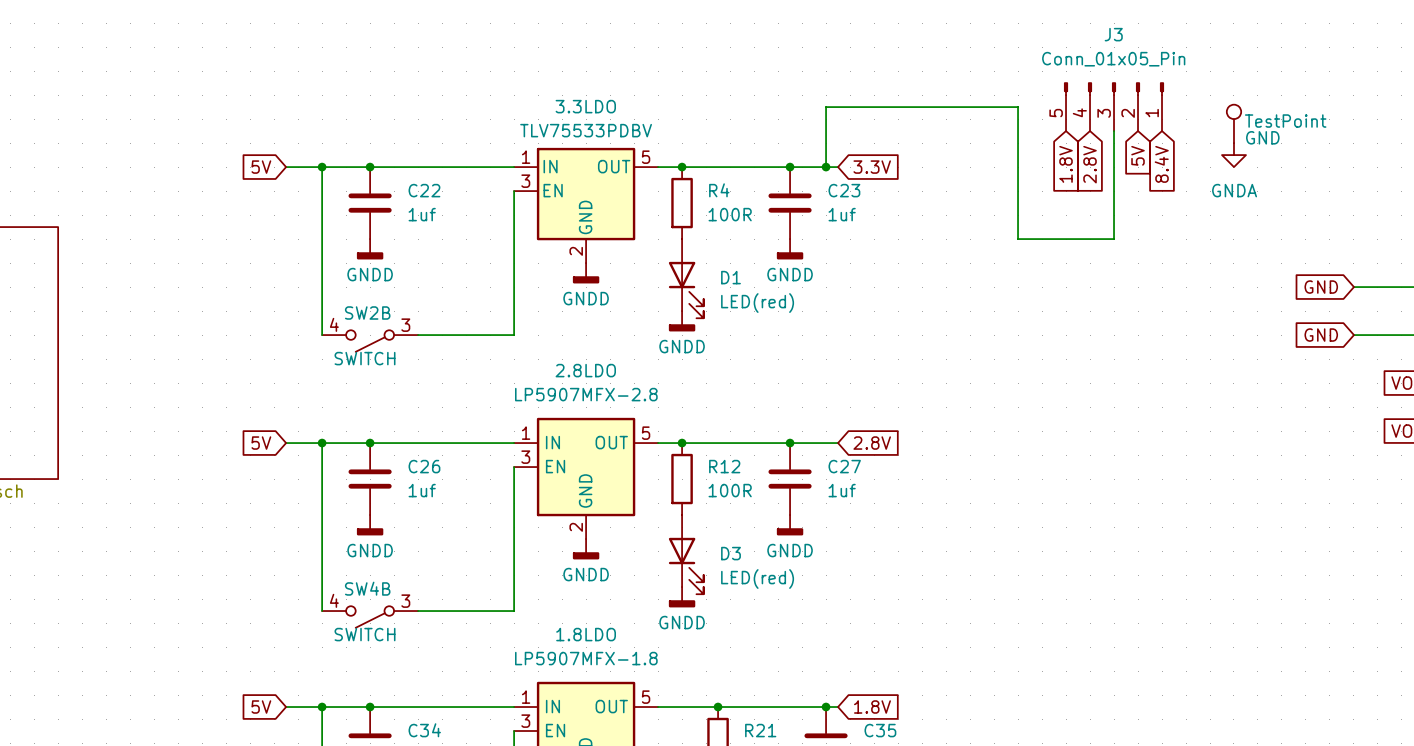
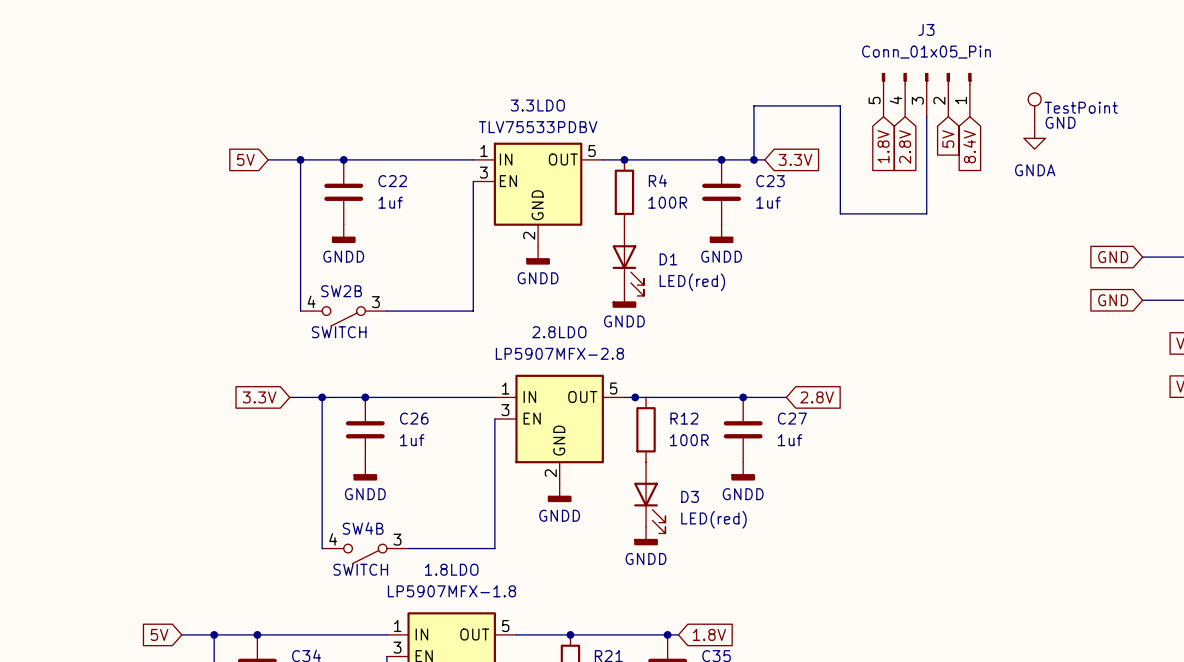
wire: (1018, 119) (1018, 107) (826, 107) (826, 167) -> (840, 105) (753, 105) (753, 159)
global label position: 5V (261, 167) -> 5V (245, 159)
wire: (286, 167) (514, 167) -> (268, 159) (473, 159)
wire: (322, 167) (322, 335) -> (300, 159) (300, 311)
junction: (322, 167) -> none
junction: (370, 167) -> none
wire: (658, 167) (838, 167) -> (602, 159) (764, 159)
junction: (682, 167) -> none
junction position: (790, 167) -> (624, 159)
junction: (826, 167) -> none
global label position: 3.3V (872, 167) -> 3.3V (795, 159)
junction: none -> (300, 159)
junction: none -> (343, 159)
junction: none -> (721, 159)
junction: none -> (753, 159)
wire: (514, 191) (514, 335) (418, 335) -> (473, 181) (473, 311) (386, 311)
C22 position: (370, 203) -> (343, 192)
R4 position: (682, 203) -> (624, 192)
C23 position: (790, 203) -> (721, 192)
3.3LDO position: (586, 205) -> (538, 194)
power symbol: GNDD (370, 249) -> none
power symbol: GNDD (790, 249) -> none
power symbol: none -> GNDD (343, 233)
power symbol: none -> GNDD (721, 233)
power symbol: GNDD (586, 273) -> none
D1 position: (686, 278) -> (628, 260)
power symbol position: GNDD (682, 321) -> GNDD (538, 255)
power symbol: none -> GNDD (624, 298)
SW2B position: (370, 341) -> (343, 316)
global label: 5V (261, 443) -> none
wire: (286, 443) (406, 443) -> none
wire: (322, 443) (322, 611) -> (322, 397) (322, 548)
junction: (322, 443) -> none
junction: (370, 443) -> none
global label: none -> 3.3V (259, 397)
junction: none -> (322, 397)
junction: none -> (365, 397)
junction: (682, 443) -> none
wire: none -> (678, 397) (786, 397)
global label position: 2.8V (872, 443) -> 2.8V (817, 397)
junction: none -> (743, 397)
wire: (514, 467) (514, 611) (418, 611) -> (494, 419) (494, 548) (408, 548)
2.8LDO position: (586, 478) -> (559, 429)
C26 position: (370, 479) -> (365, 429)
R12 position: (682, 479) -> (646, 429)
C27 position: (790, 479) -> (743, 429)
power symbol: GNDD (370, 525) -> none
power symbol: none -> GNDD (365, 471)
power symbol: GNDD (790, 525) -> none
power symbol: none -> GNDD (743, 471)
power symbol: GNDD (586, 549) -> none
power symbol: none -> GNDD (559, 492)
D3 position: (686, 554) -> (649, 497)
power symbol: GNDD (682, 597) -> none
power symbol: none -> GNDD (646, 536)
SW4B position: (370, 617) -> (365, 553)

